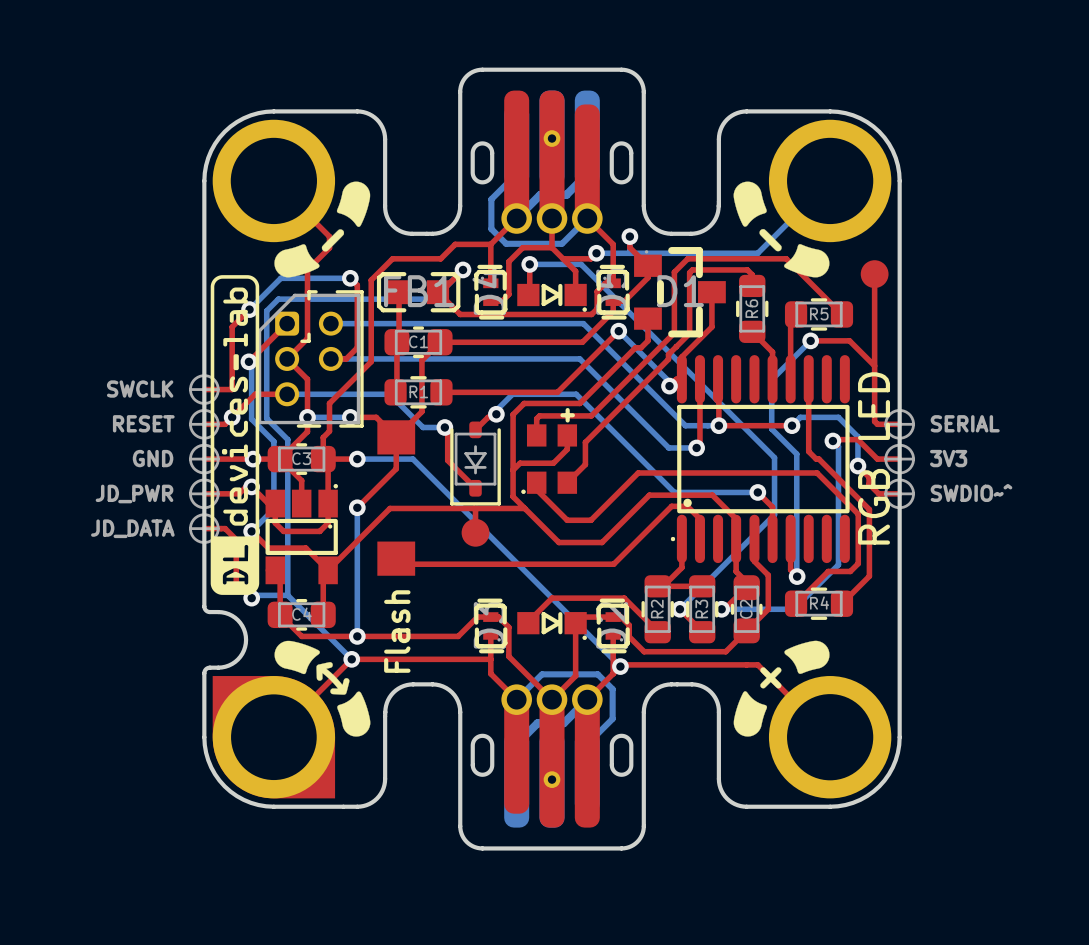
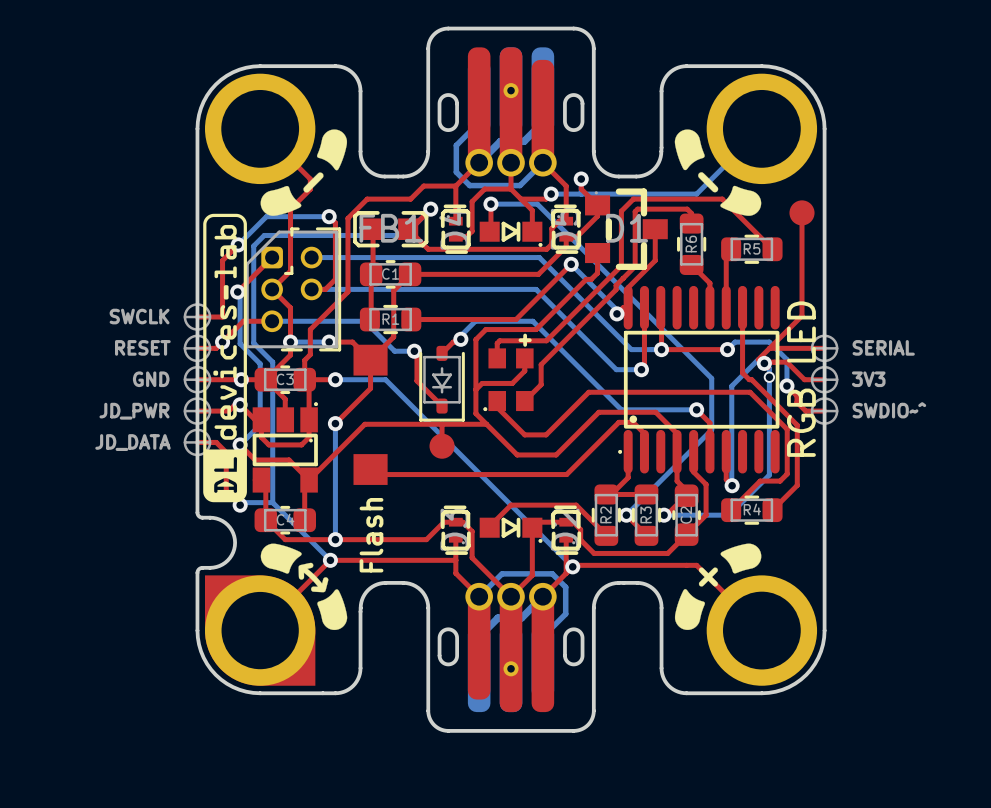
top track: (810, 340) (849, 340) (874, 365) -> none
bottom track: (810, 340) (771, 379) (771, 429) (796, 454) (796, 466) -> (758, 359) (731, 386)
via: (810, 340) -> none
top track: (874, 388) (874, 421) (877, 424) -> (769, 348) (804, 348)
top track: none -> (802, 315) (758, 359)
via: none -> (769, 377)

